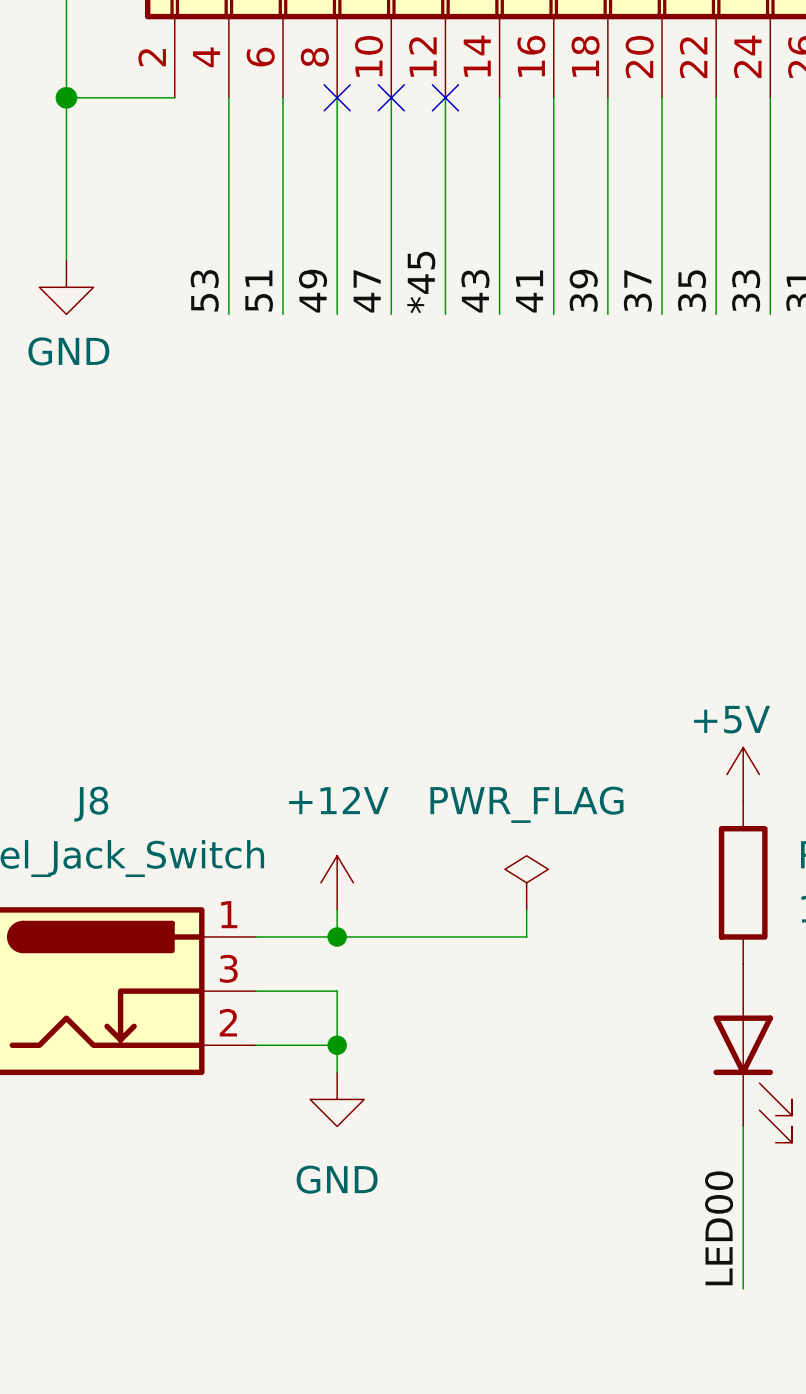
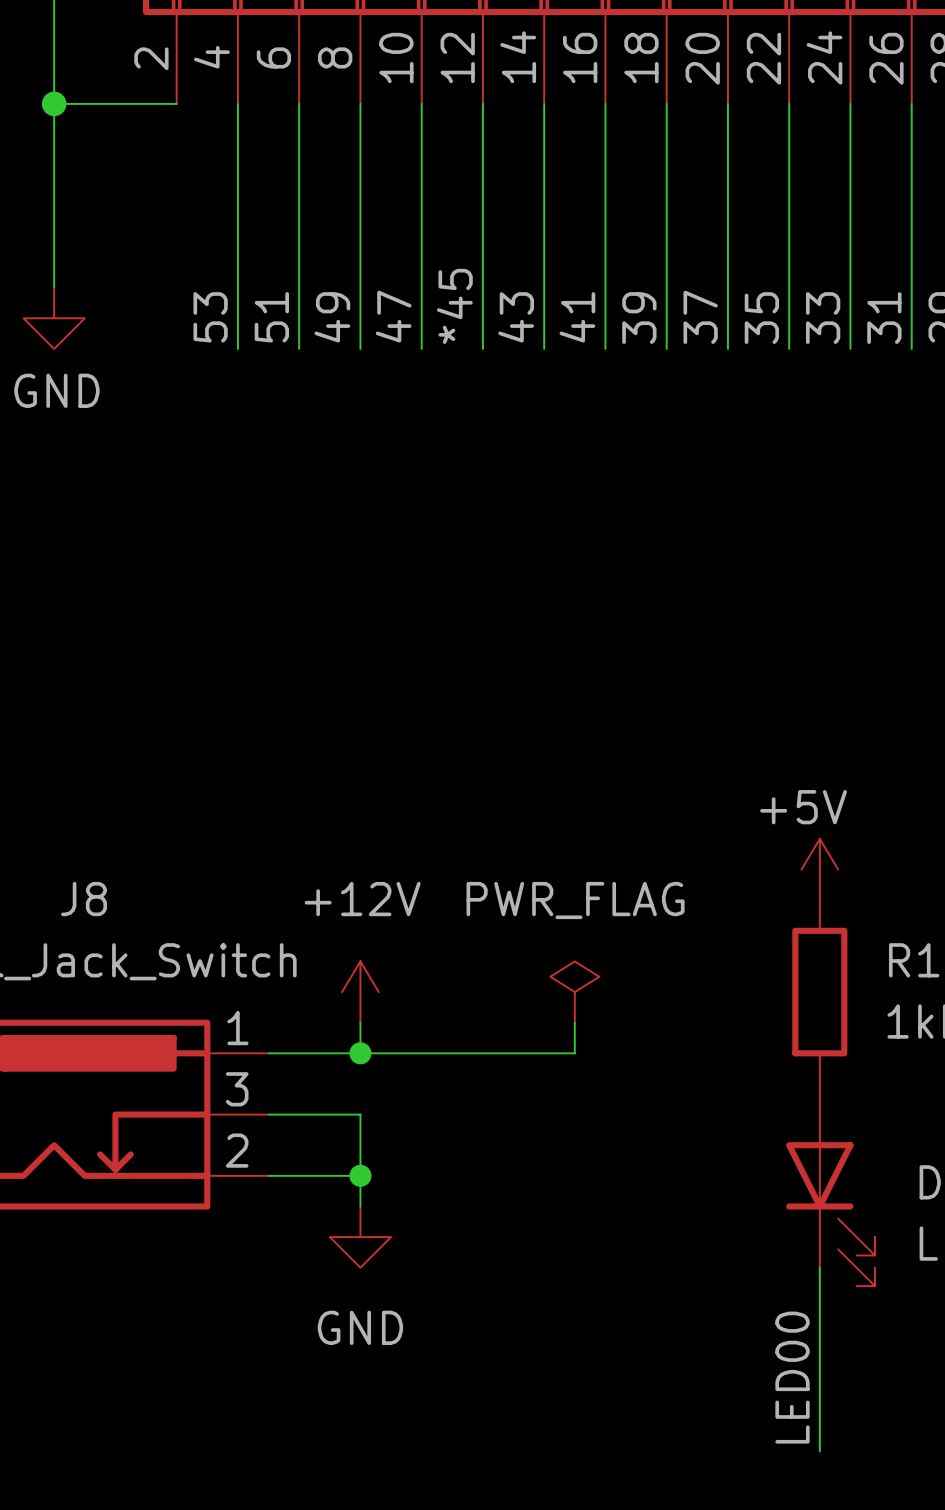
no-connect mark: (337, 97) -> none
no-connect mark: (391, 97) -> none
no-connect mark: (445, 97) -> none

